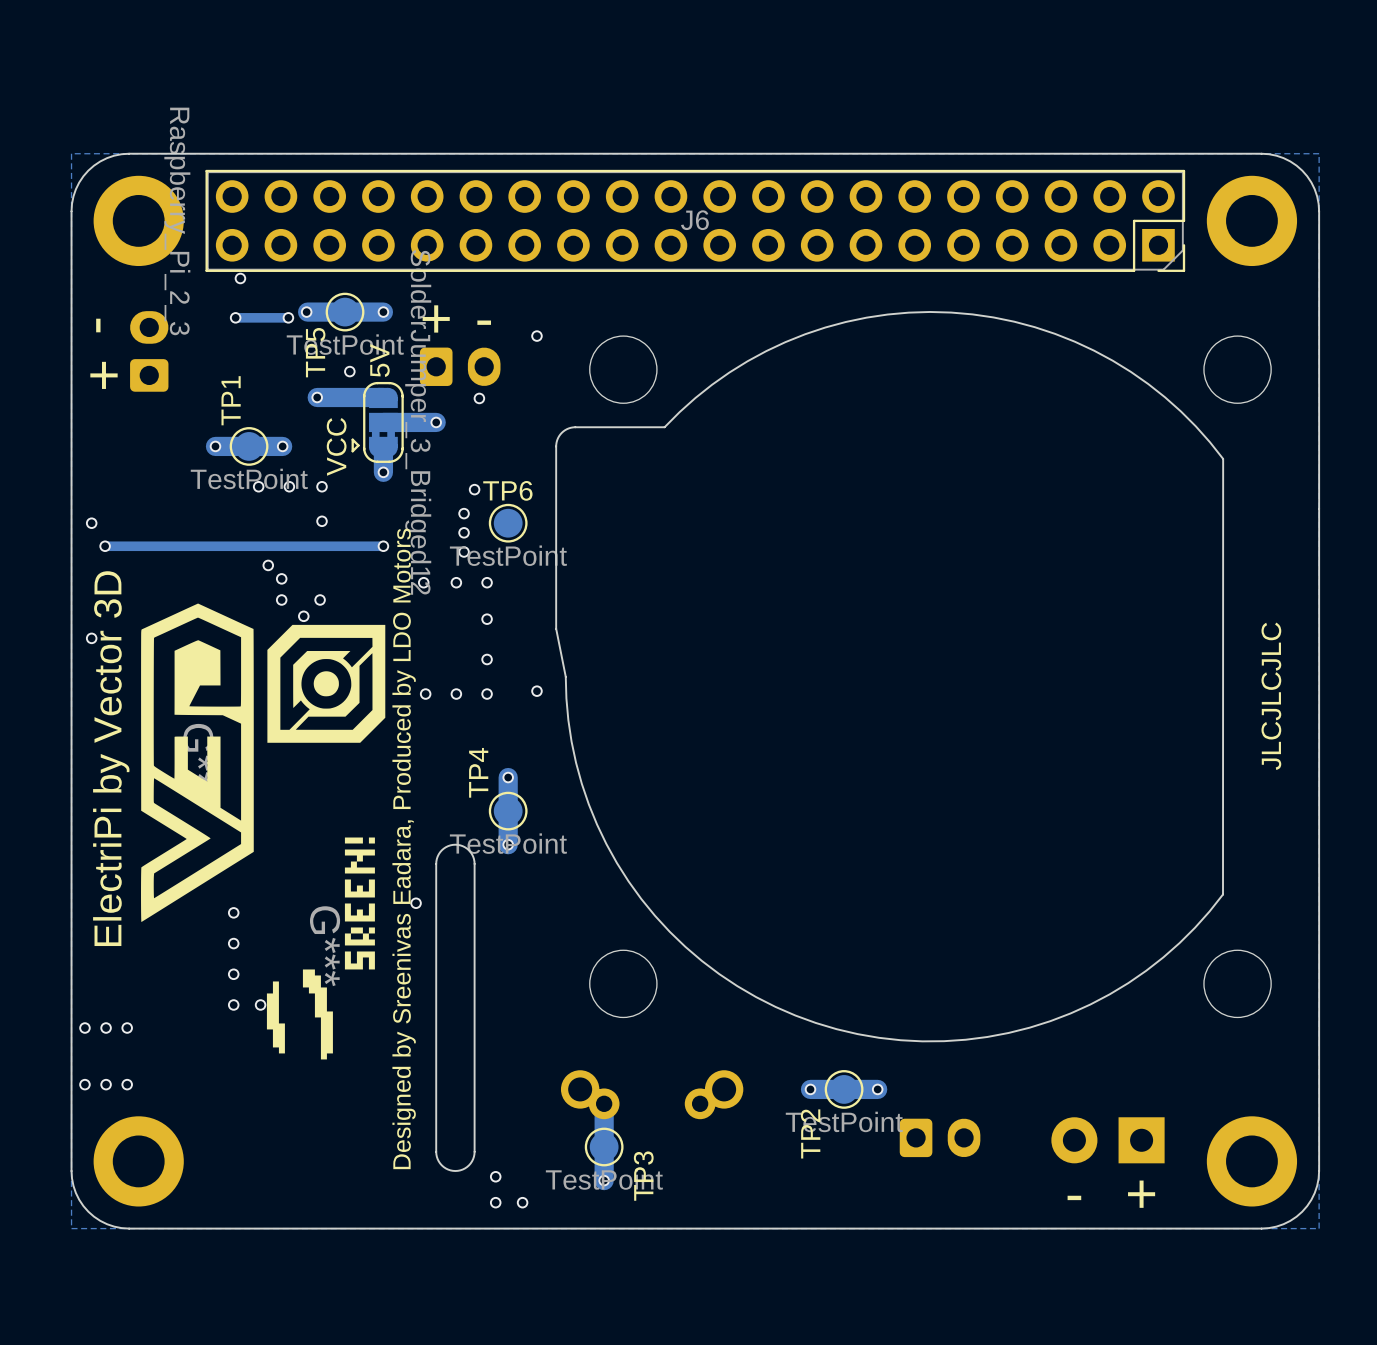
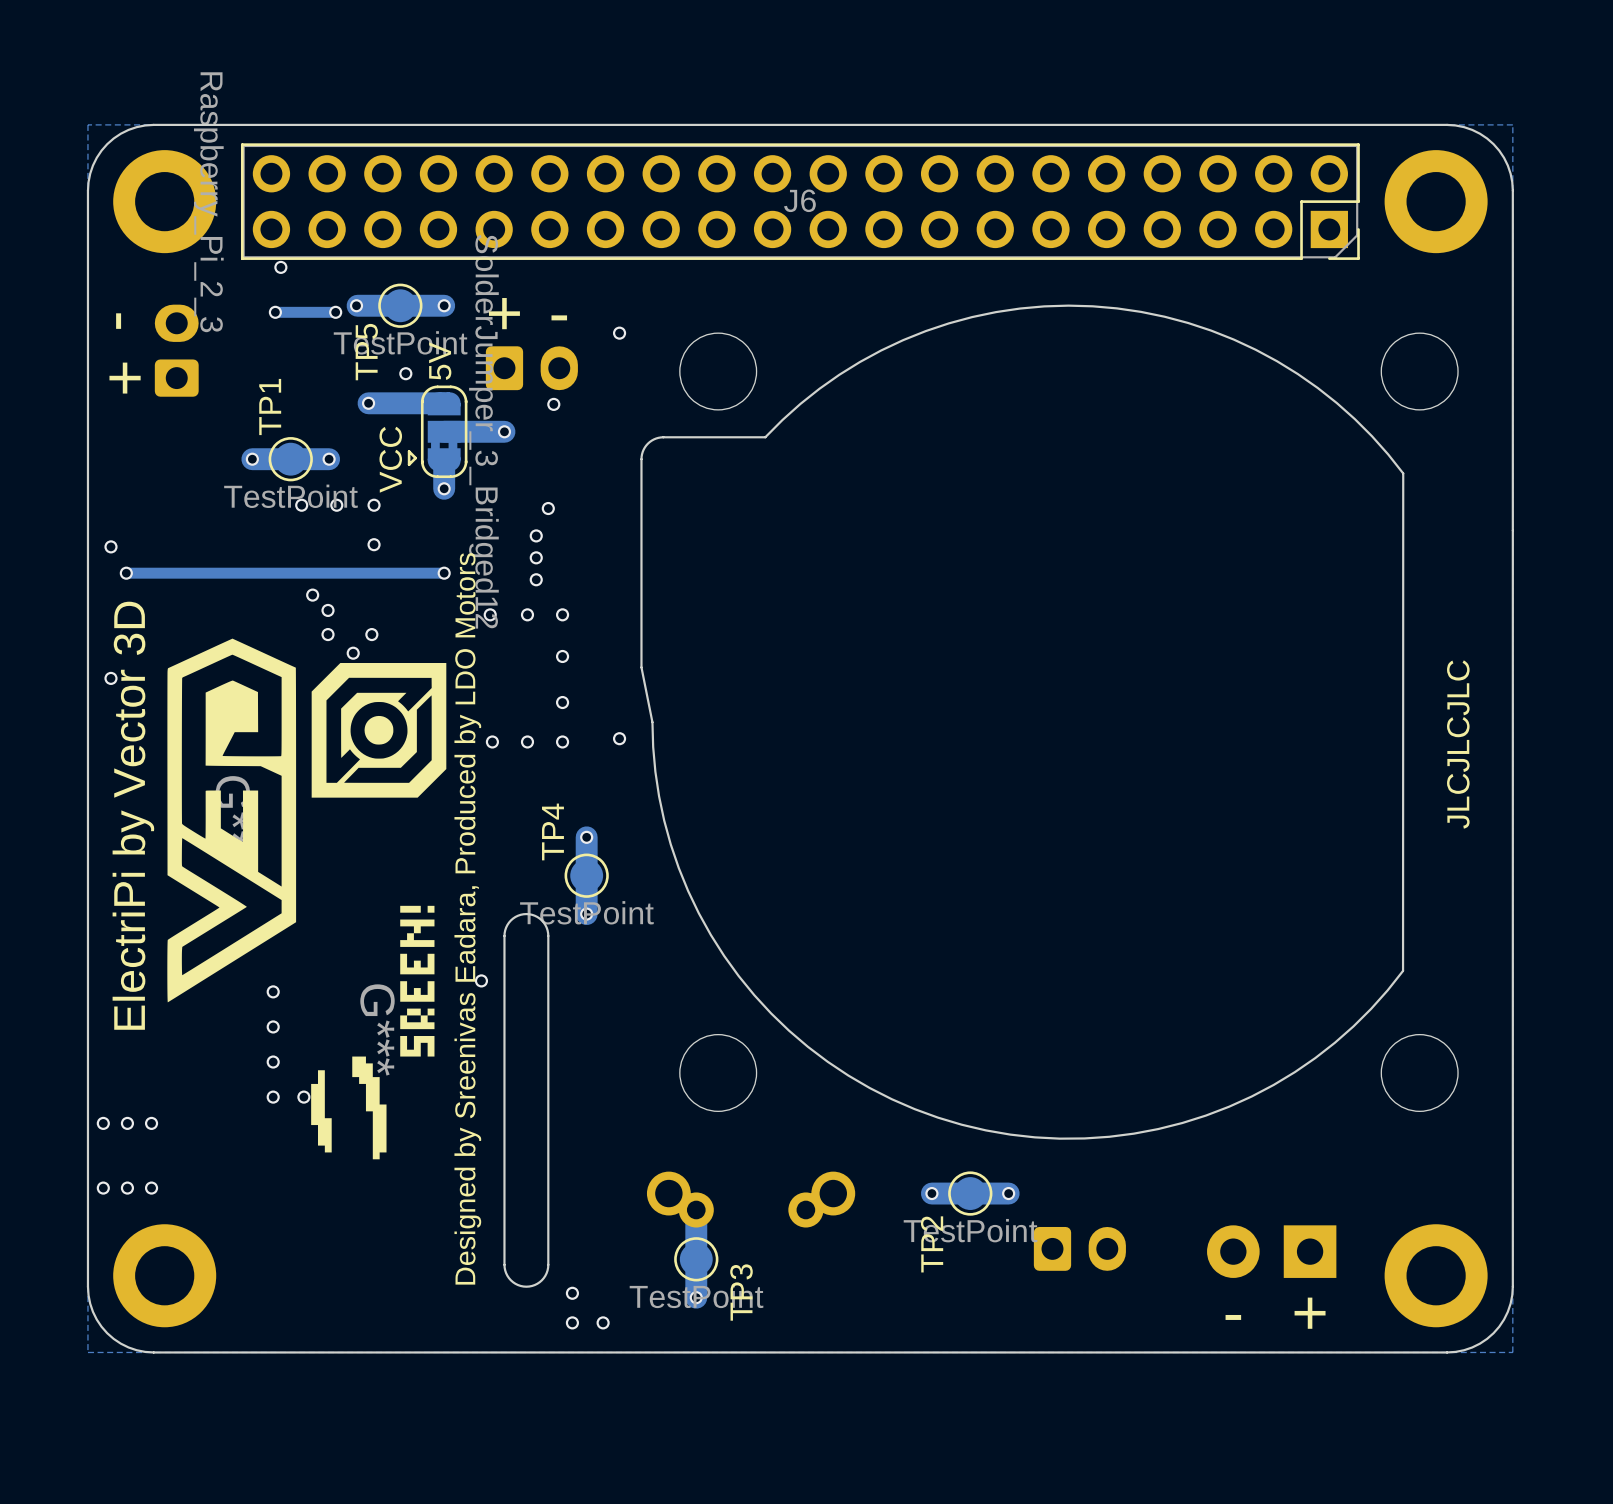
TP6: TestPoint (508, 523) -> none

